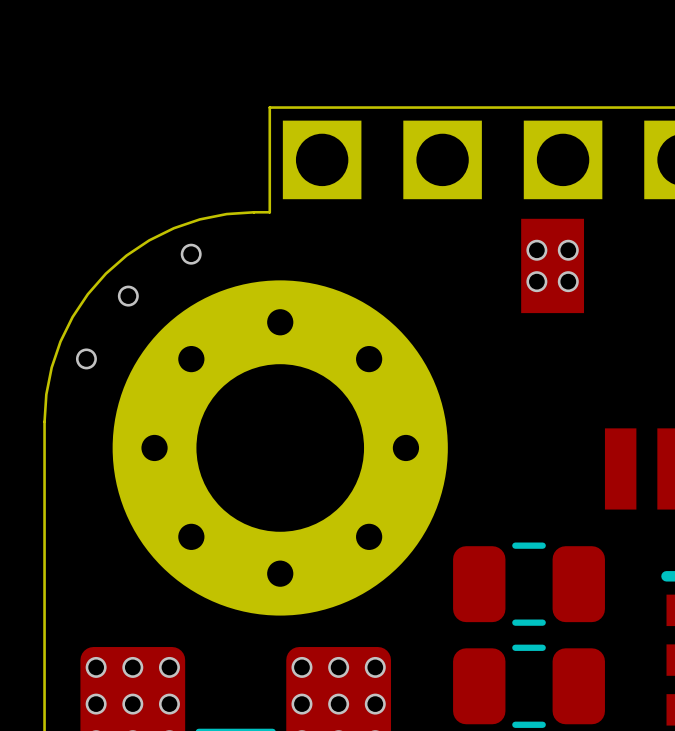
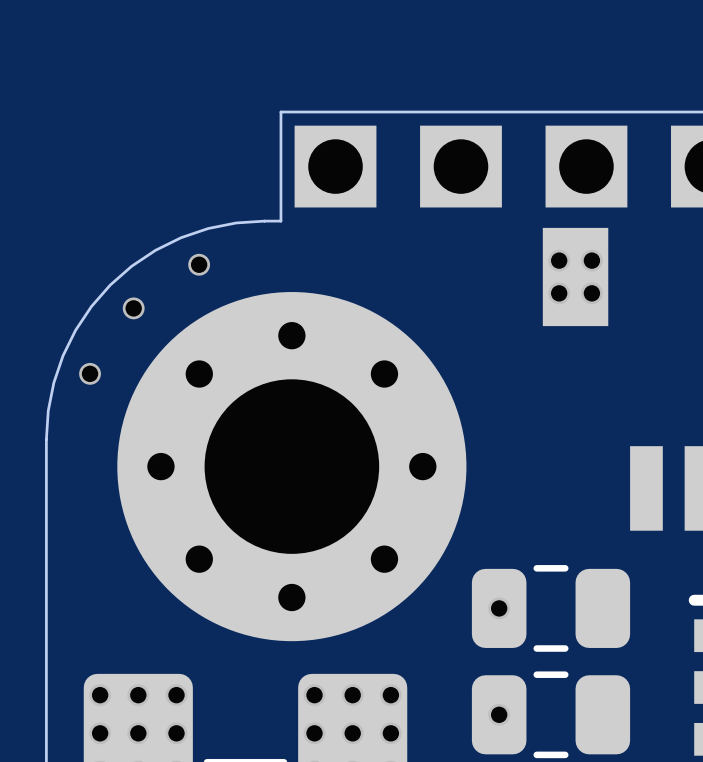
via: none -> (499, 608)
via: none -> (499, 714)

